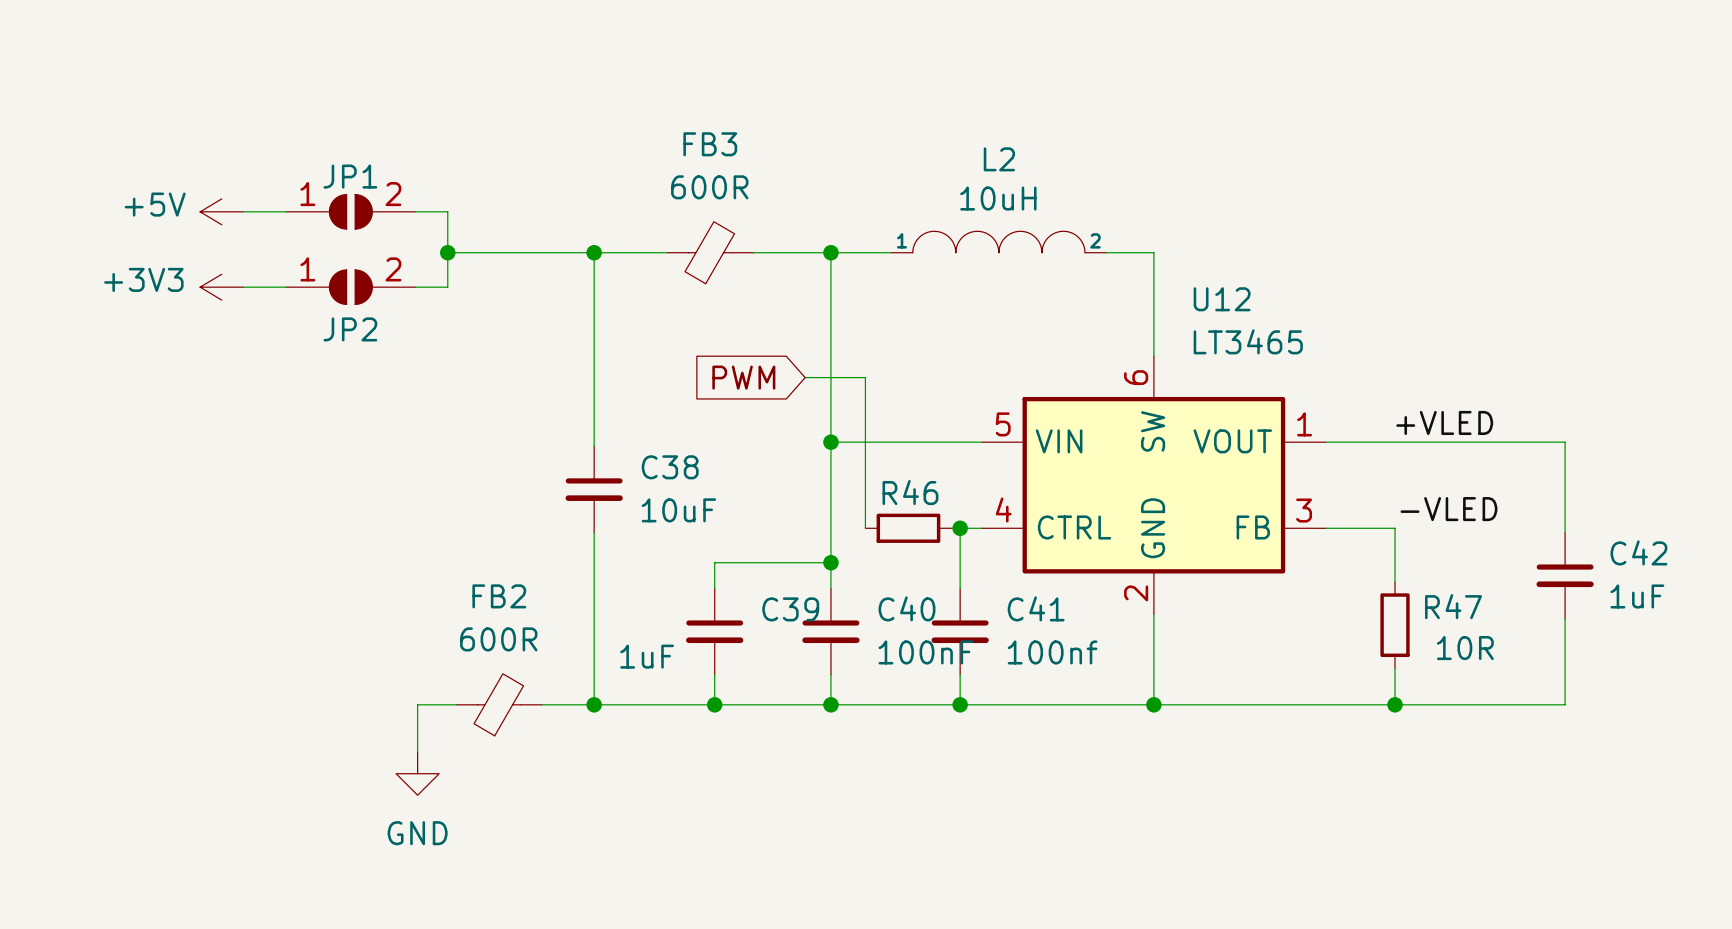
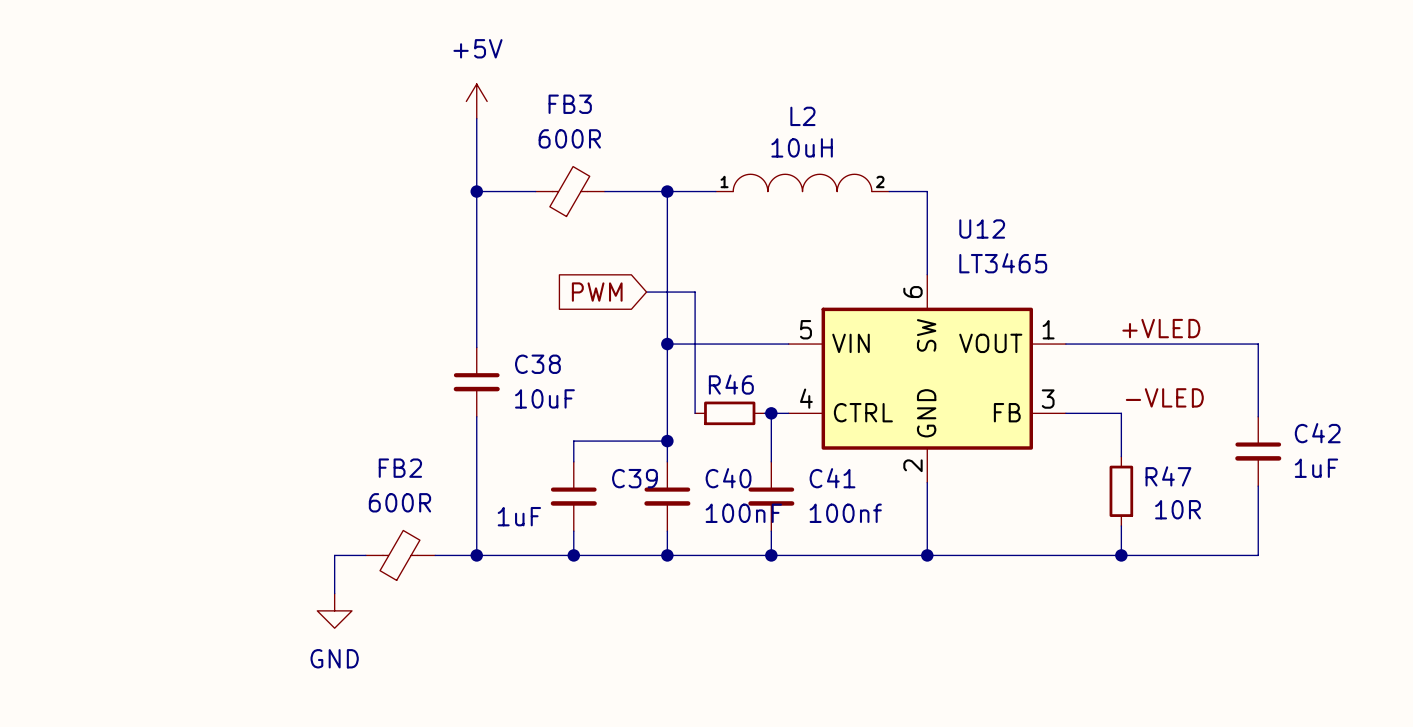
power symbol rotation: 0° (221, 211) -> 90° clockwise (476, 101)
power symbol position: +5V (221, 211) -> +5V (476, 101)
wire: (243, 211) (286, 211) -> none
JP1: (350, 211) -> none
wire: (415, 211) (447, 211) (447, 287) (415, 287) -> none
wire: (447, 252) (594, 252) -> (476, 118) (476, 191)
junction: (447, 252) -> none
power symbol: +3V3 (221, 287) -> none
wire: (243, 287) (286, 287) -> none
JP2: (350, 287) -> none

